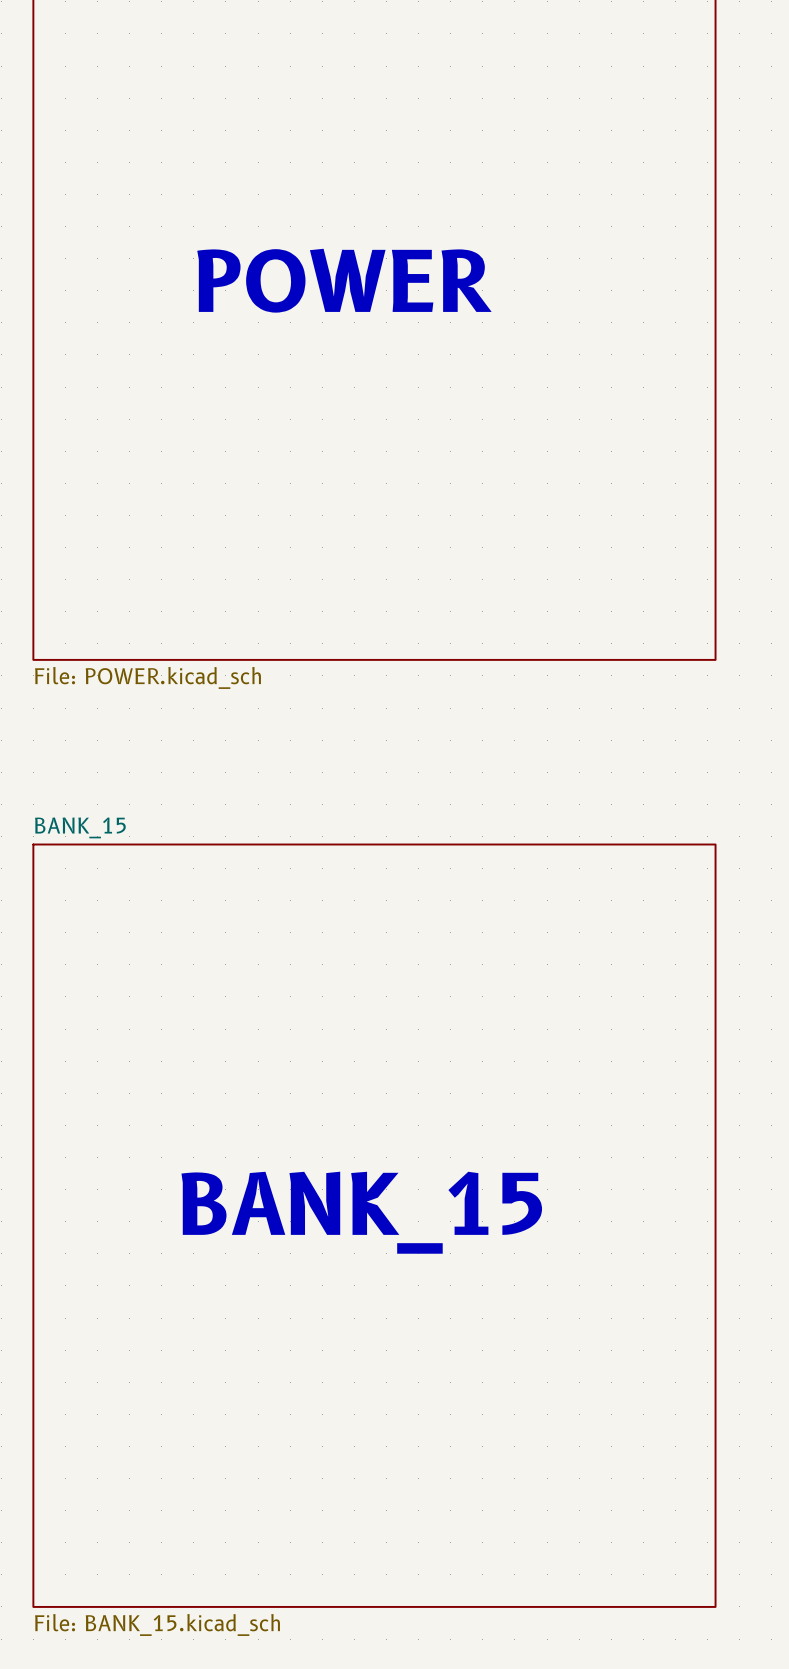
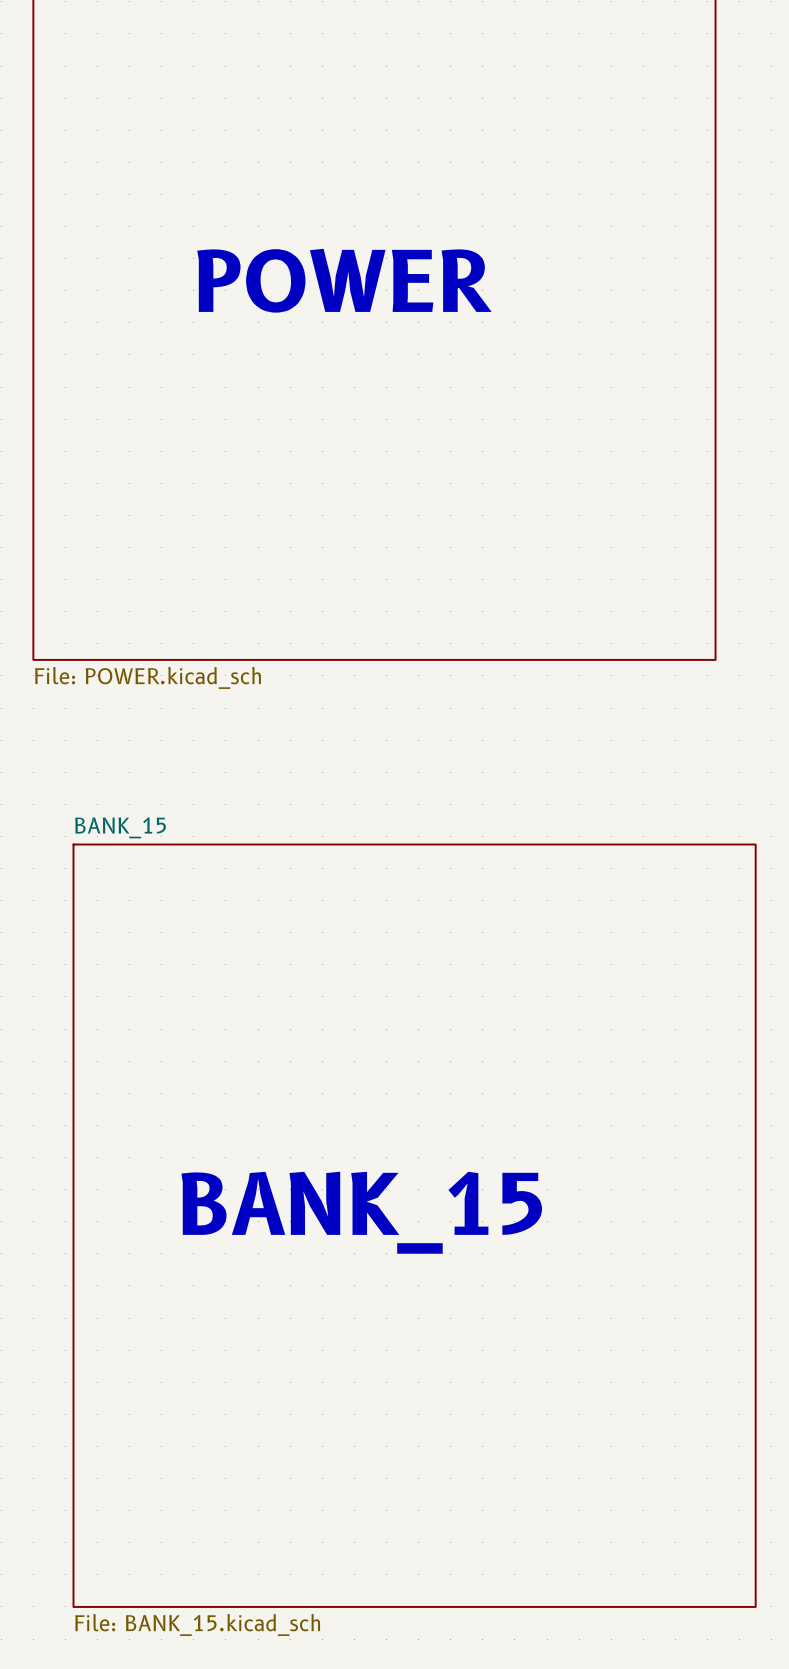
sheet BANK_15 position: (374, 1225) -> (414, 1225)

